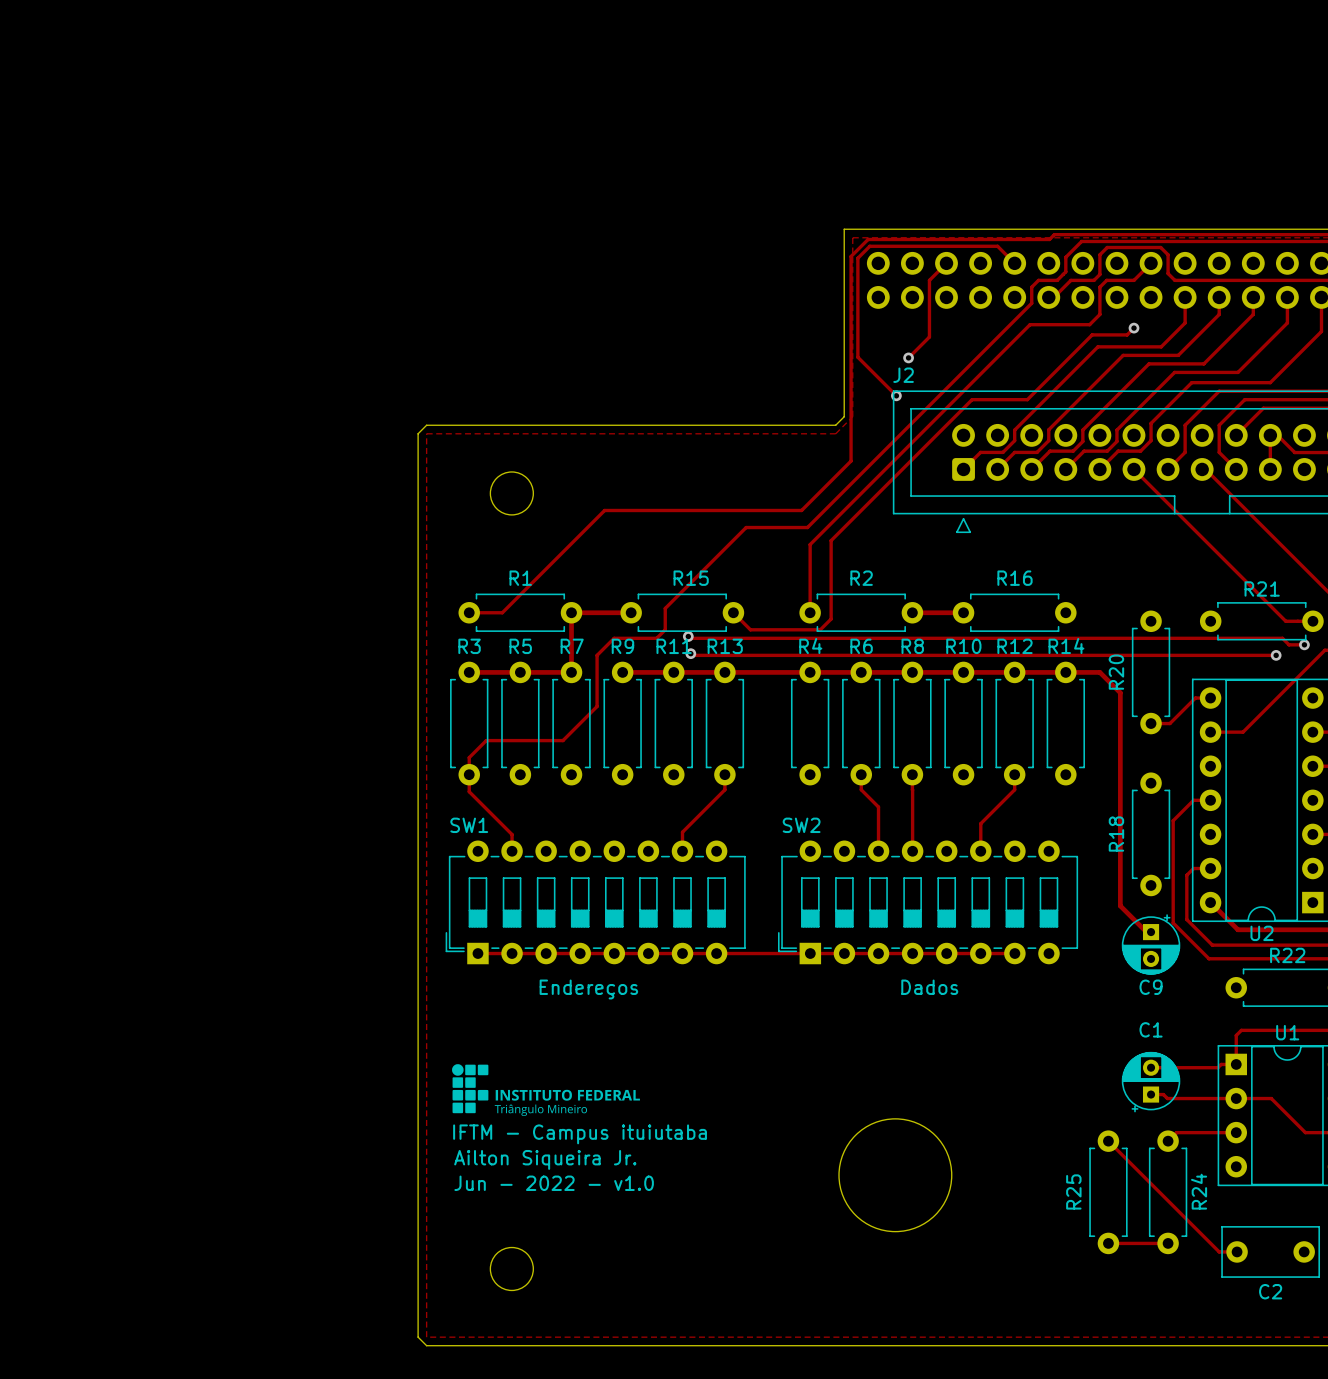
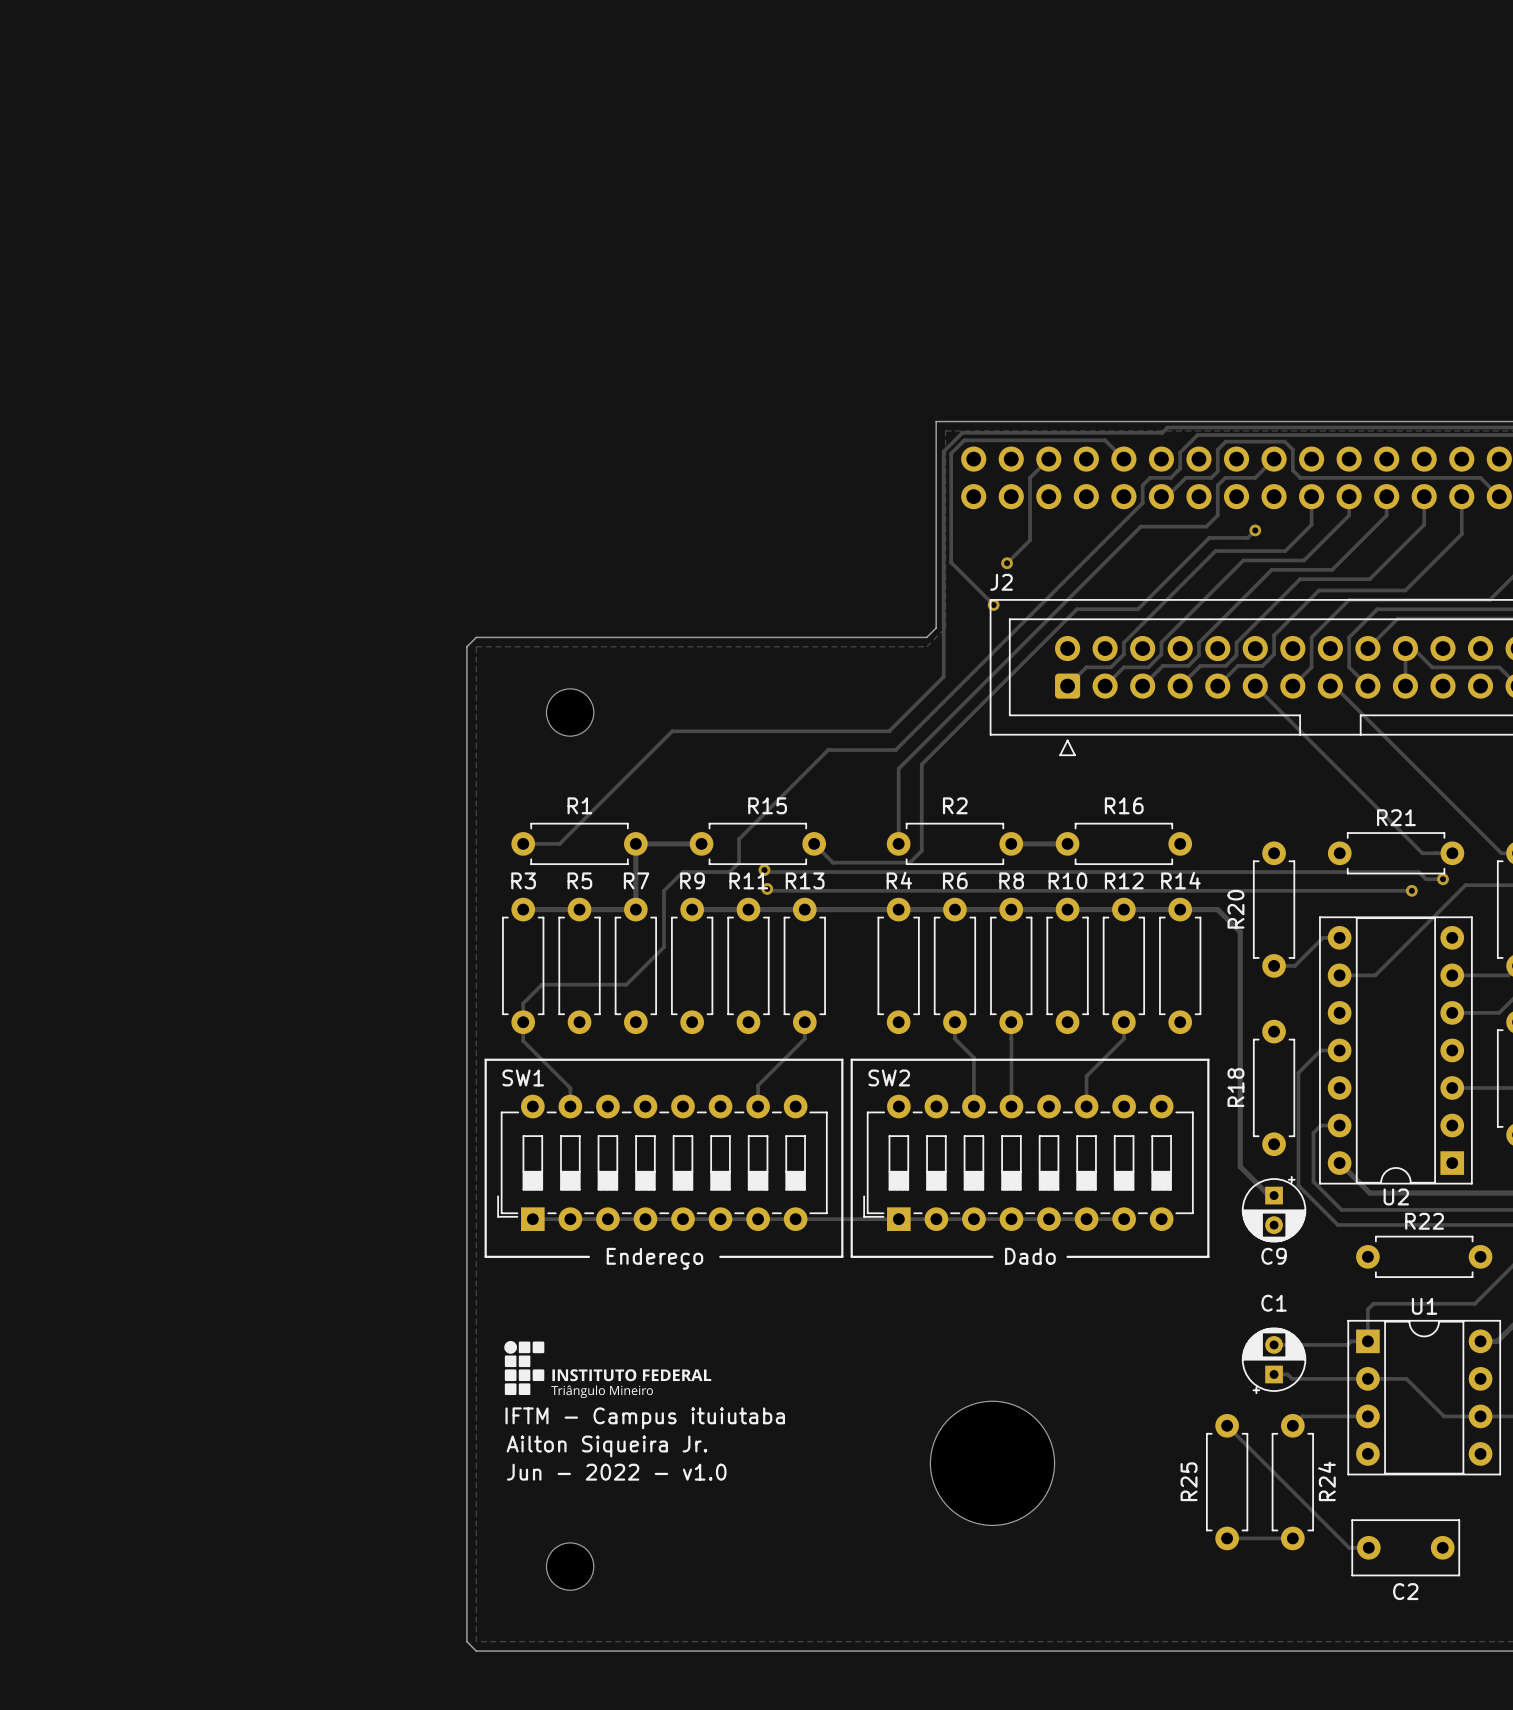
line: none -> (588, 1256) (485, 1256) (485, 1059) (842, 1059) (842, 1256) (720, 1256)
line: none -> (992, 1256) (851, 1256) (851, 1059) (1208, 1059) (1208, 1256) (1067, 1256)
text: Dados (929, 987) -> Dado (1030, 1256)
text: Endereços (588, 989) -> Endereço (654, 1258)

